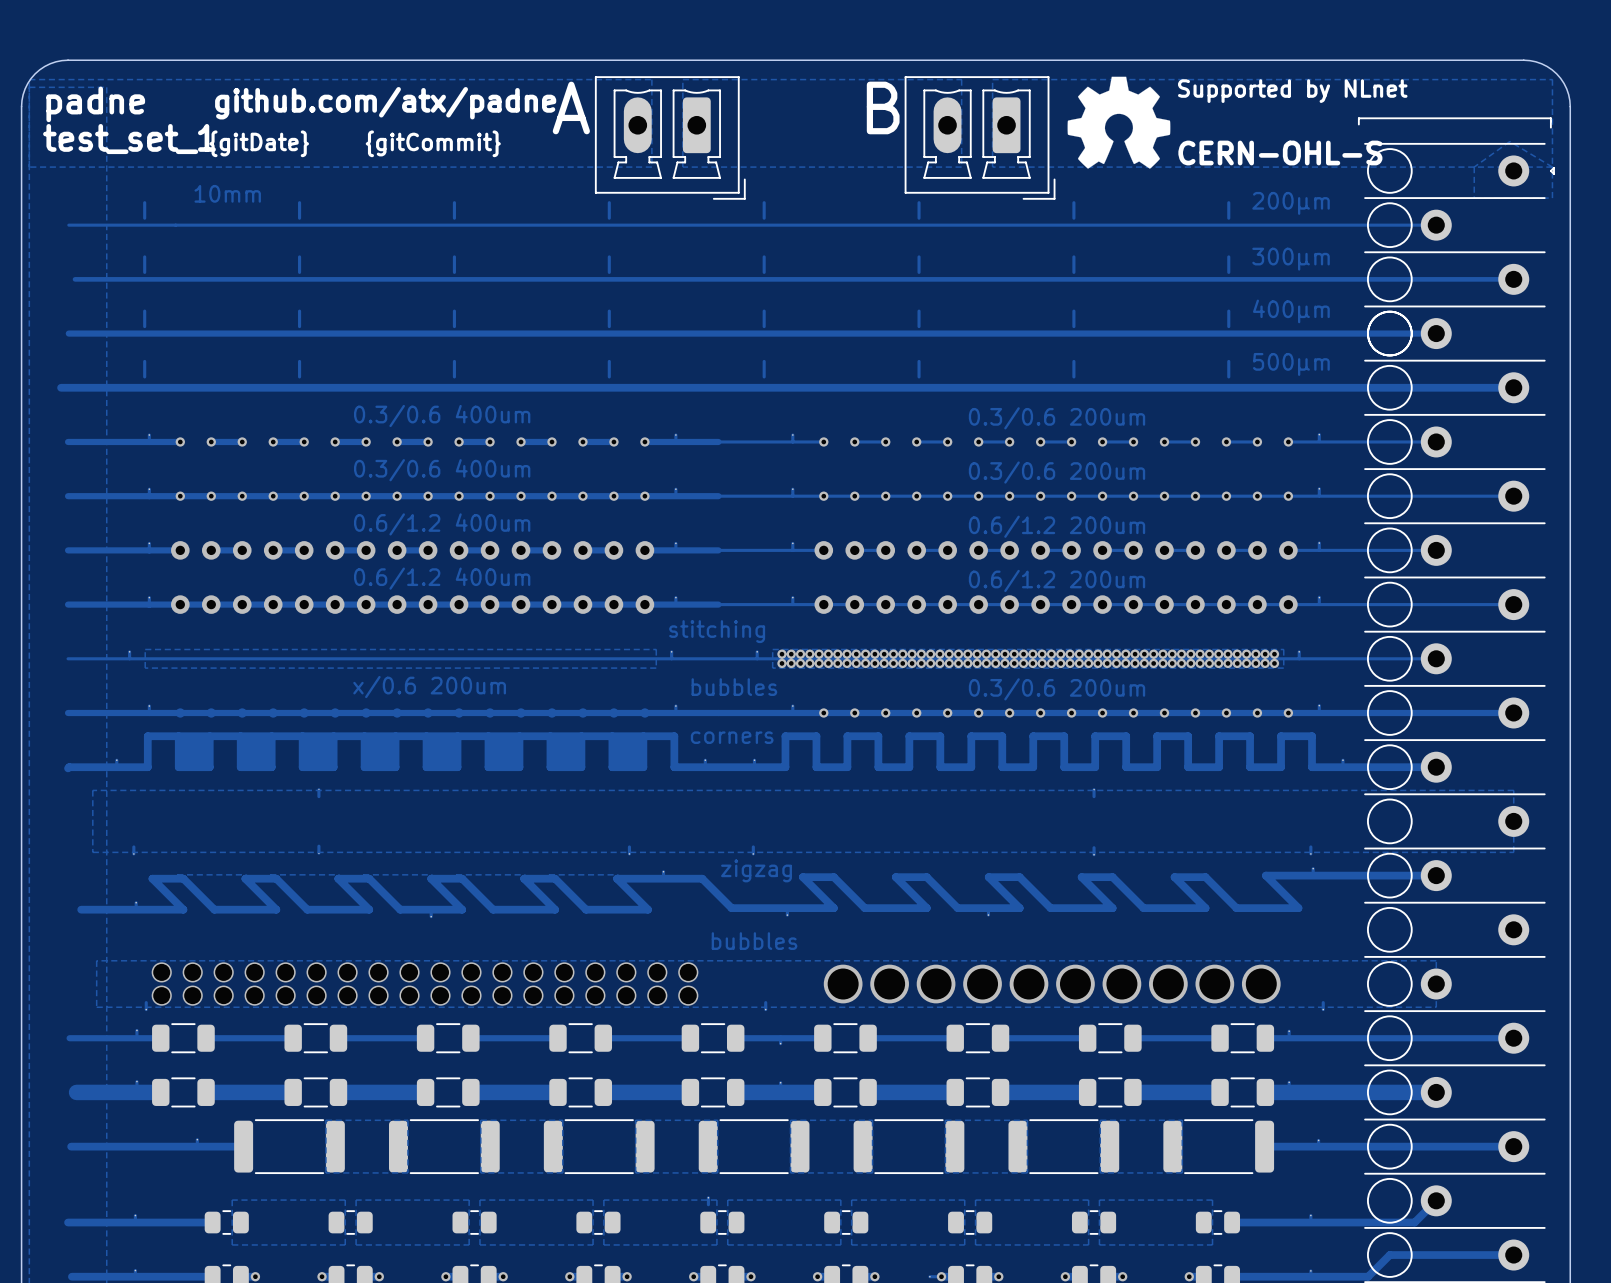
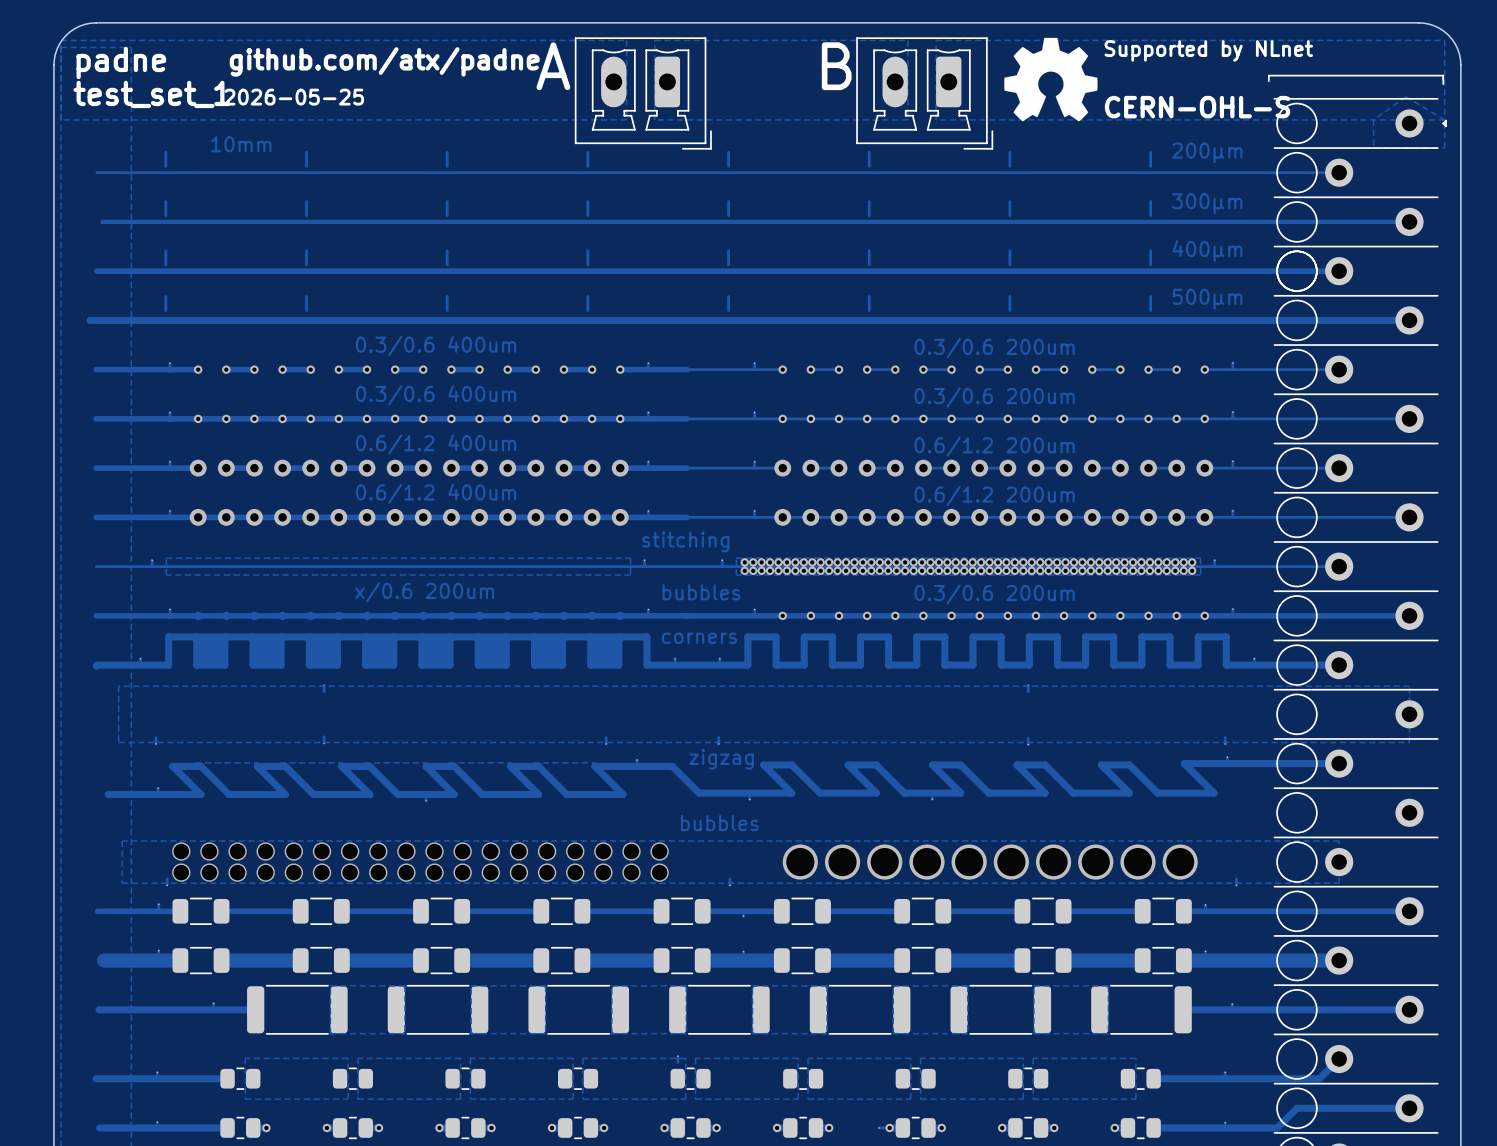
text: {gitDate} (259, 143) -> 2026-05-25 (293, 97)
text: {gitCommit} (433, 143) -> none

